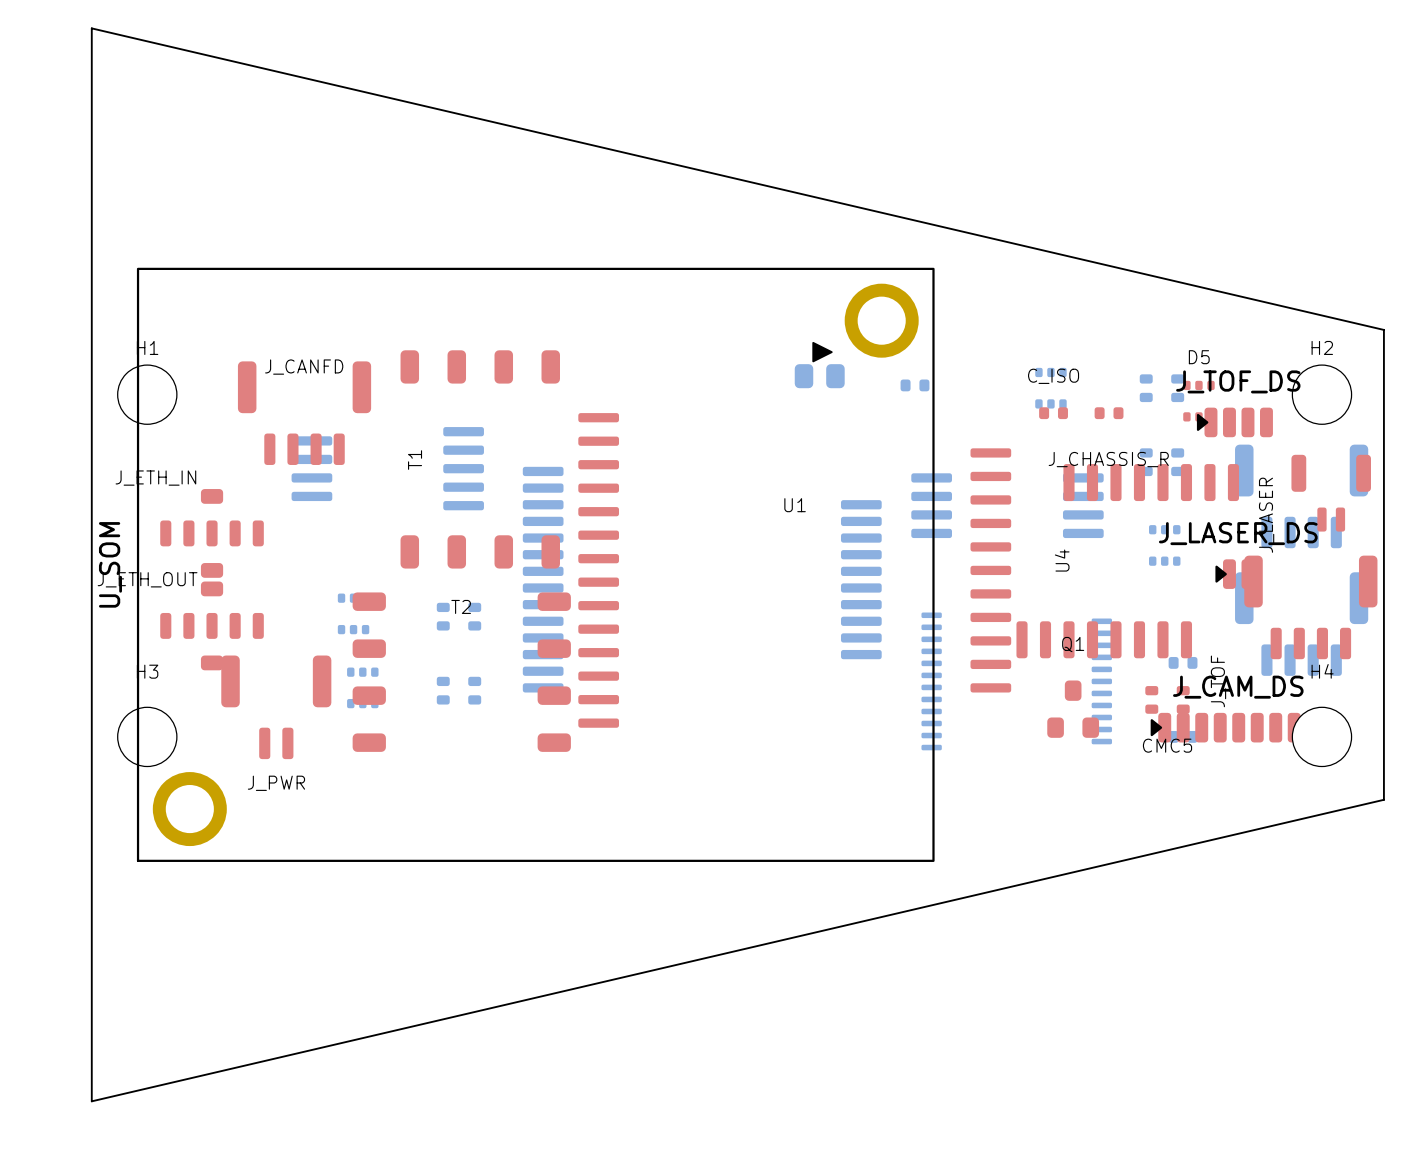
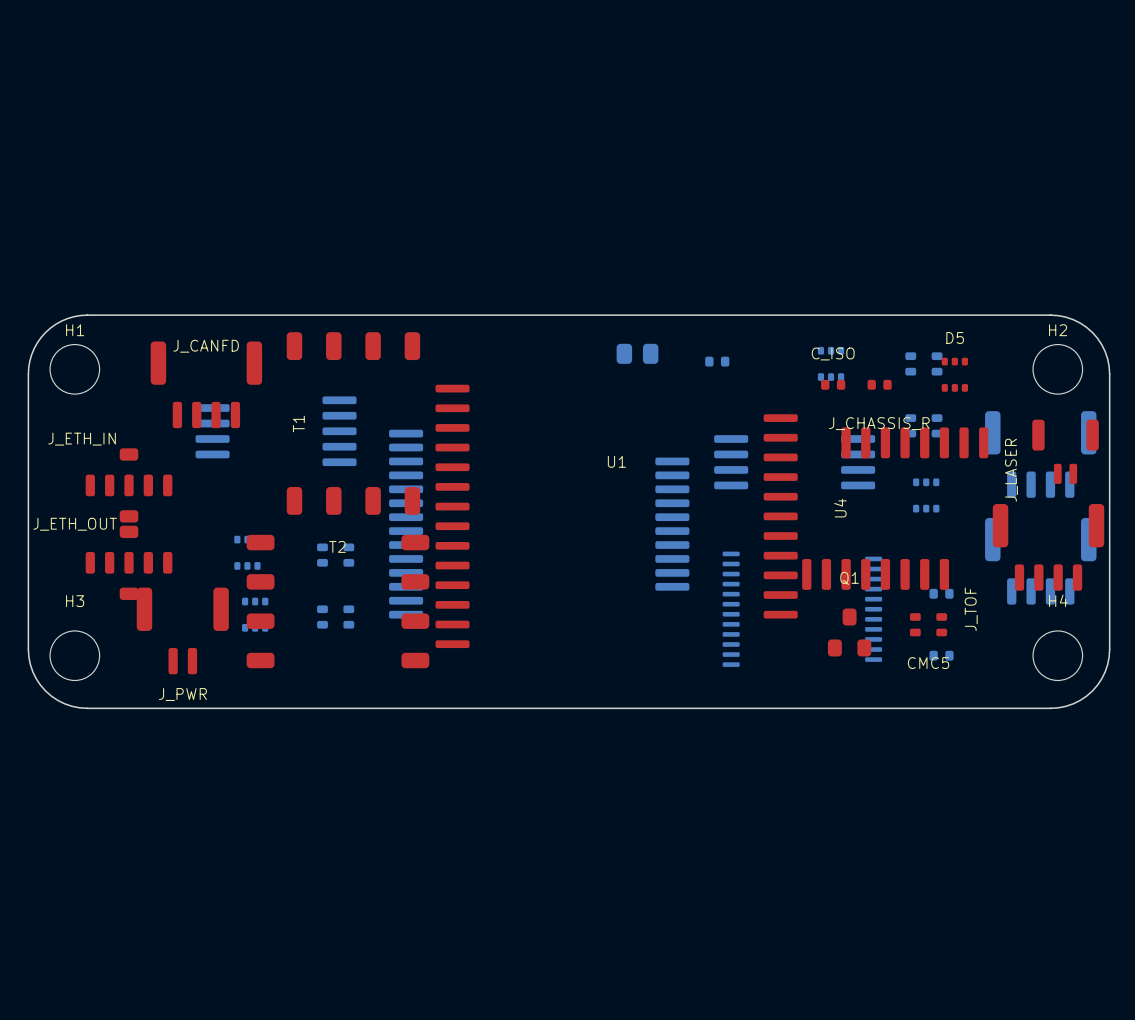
board edge: (91, 400) (91, 28) (1383, 329) (1383, 400) -> (28, 374) (31, 354) (45, 332) (61, 320) (87, 315) (1050, 315) (1073, 319) (1092, 332) (1105, 351) (1109, 374)
J_TOF_DS: (1234, 422) -> none
U_SOM: (535, 564) -> none
J_LASER_DS: (1234, 574) -> none
J_CAM_DS: (1234, 727) -> none
board edge: (91, 729) (91, 1101) (1383, 799) (1383, 729) -> (28, 649) (32, 671) (45, 691) (64, 703) (87, 708) (1050, 708) (1073, 703) (1092, 691) (1105, 671) (1109, 649)

